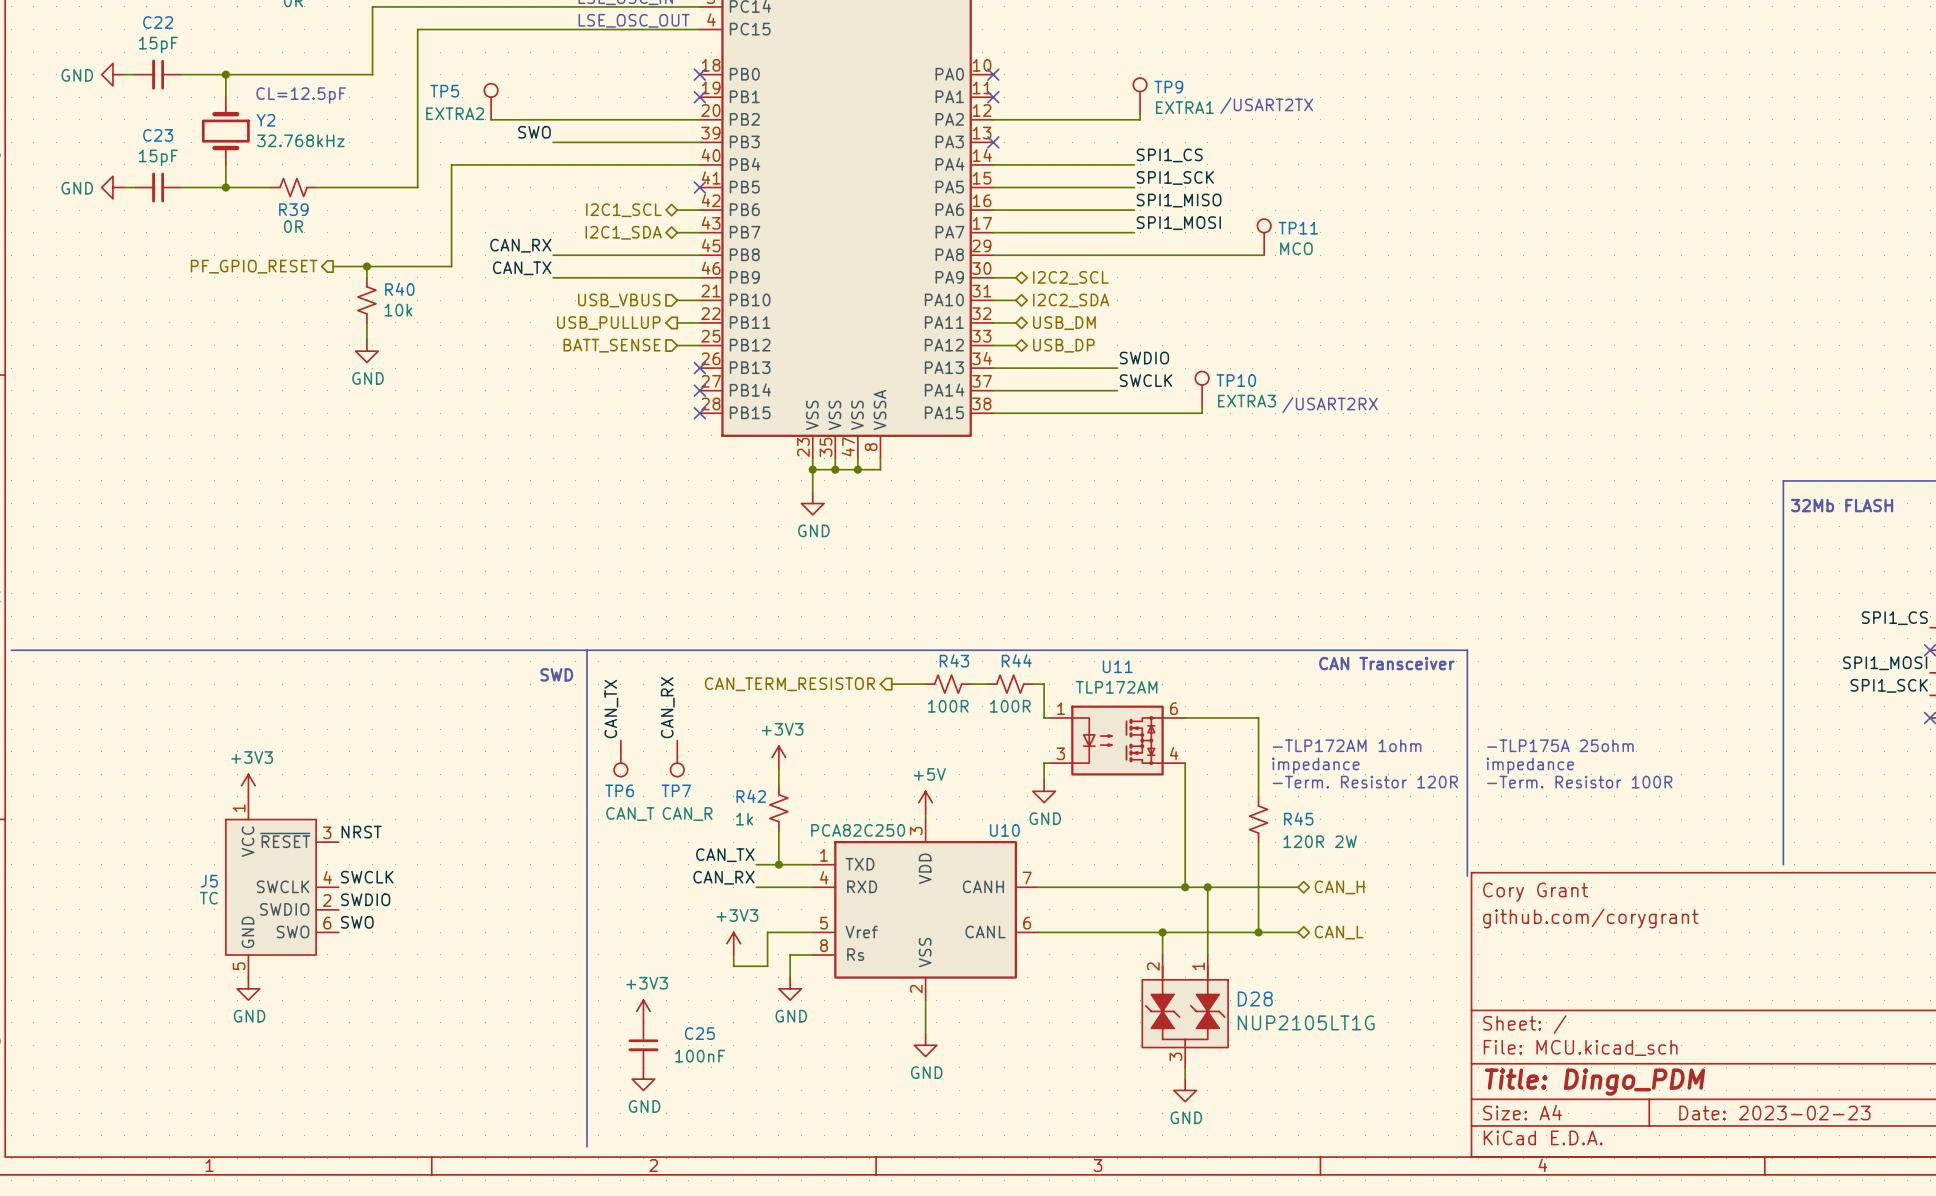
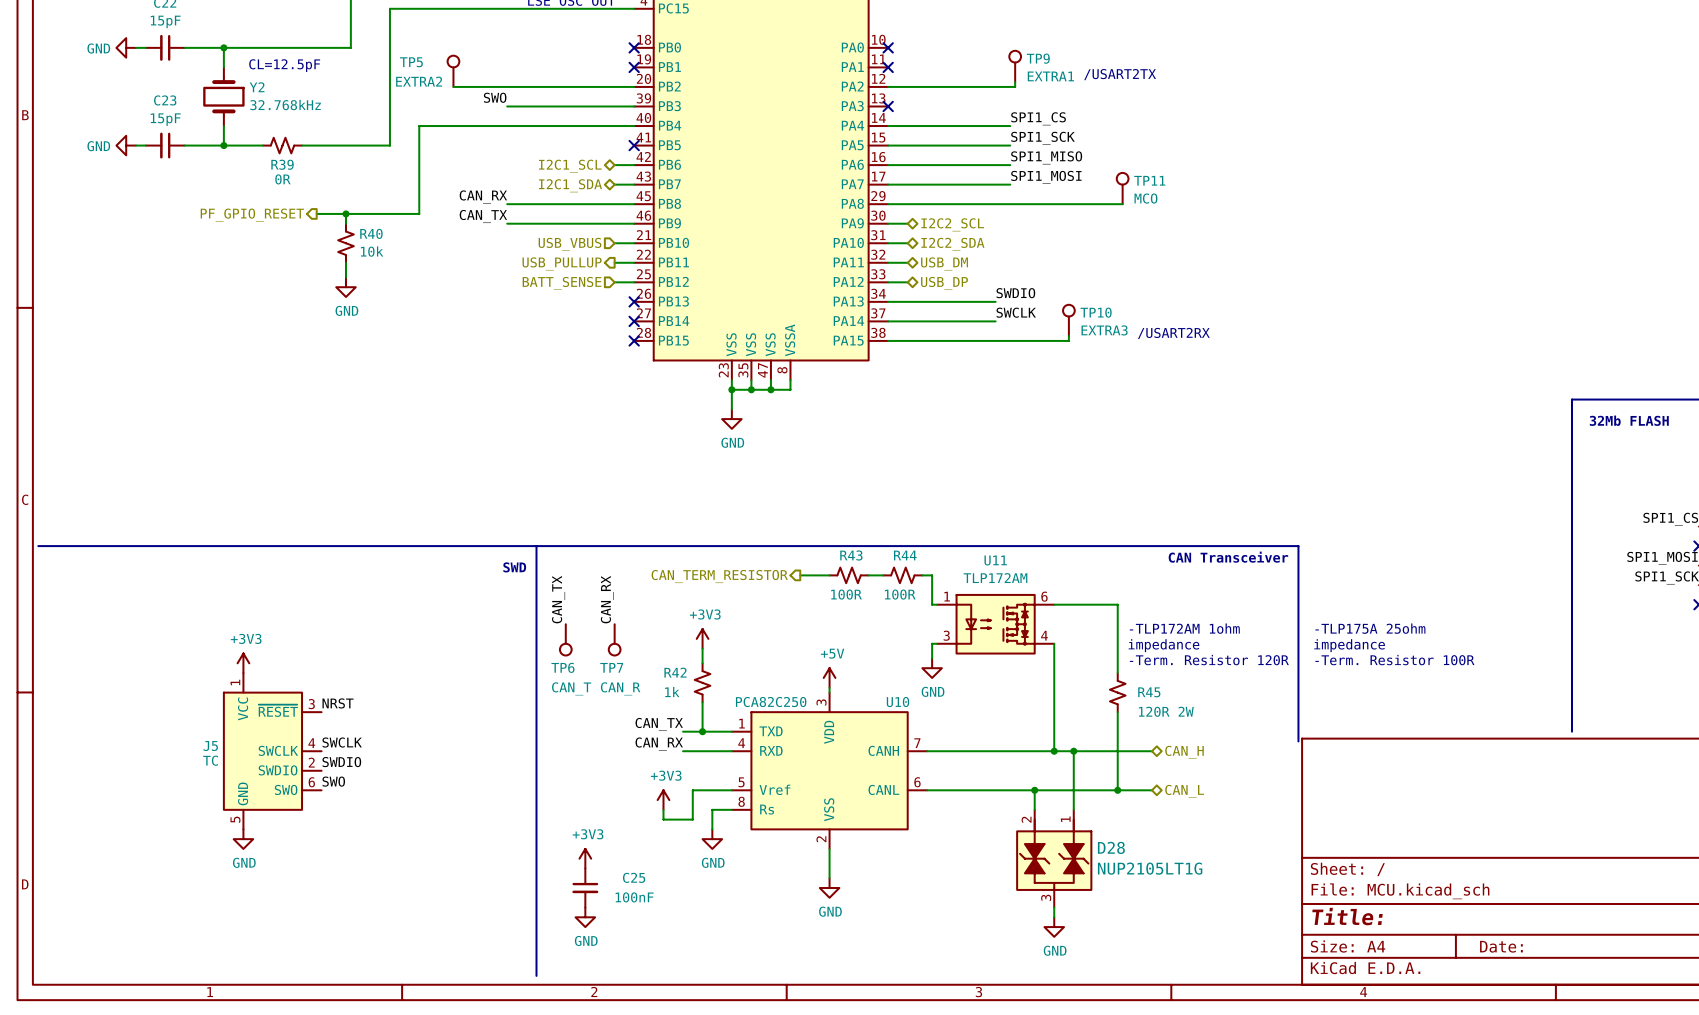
title block: Cory Grant (1535, 892) -> none
title block: github.com/corygrant (1590, 918) -> none
title block: Title: Dingo_PDM (1595, 1082) -> Title: (1347, 916)
title block: Date: 2023-02-23 (1774, 1113) -> Date: (1501, 946)

